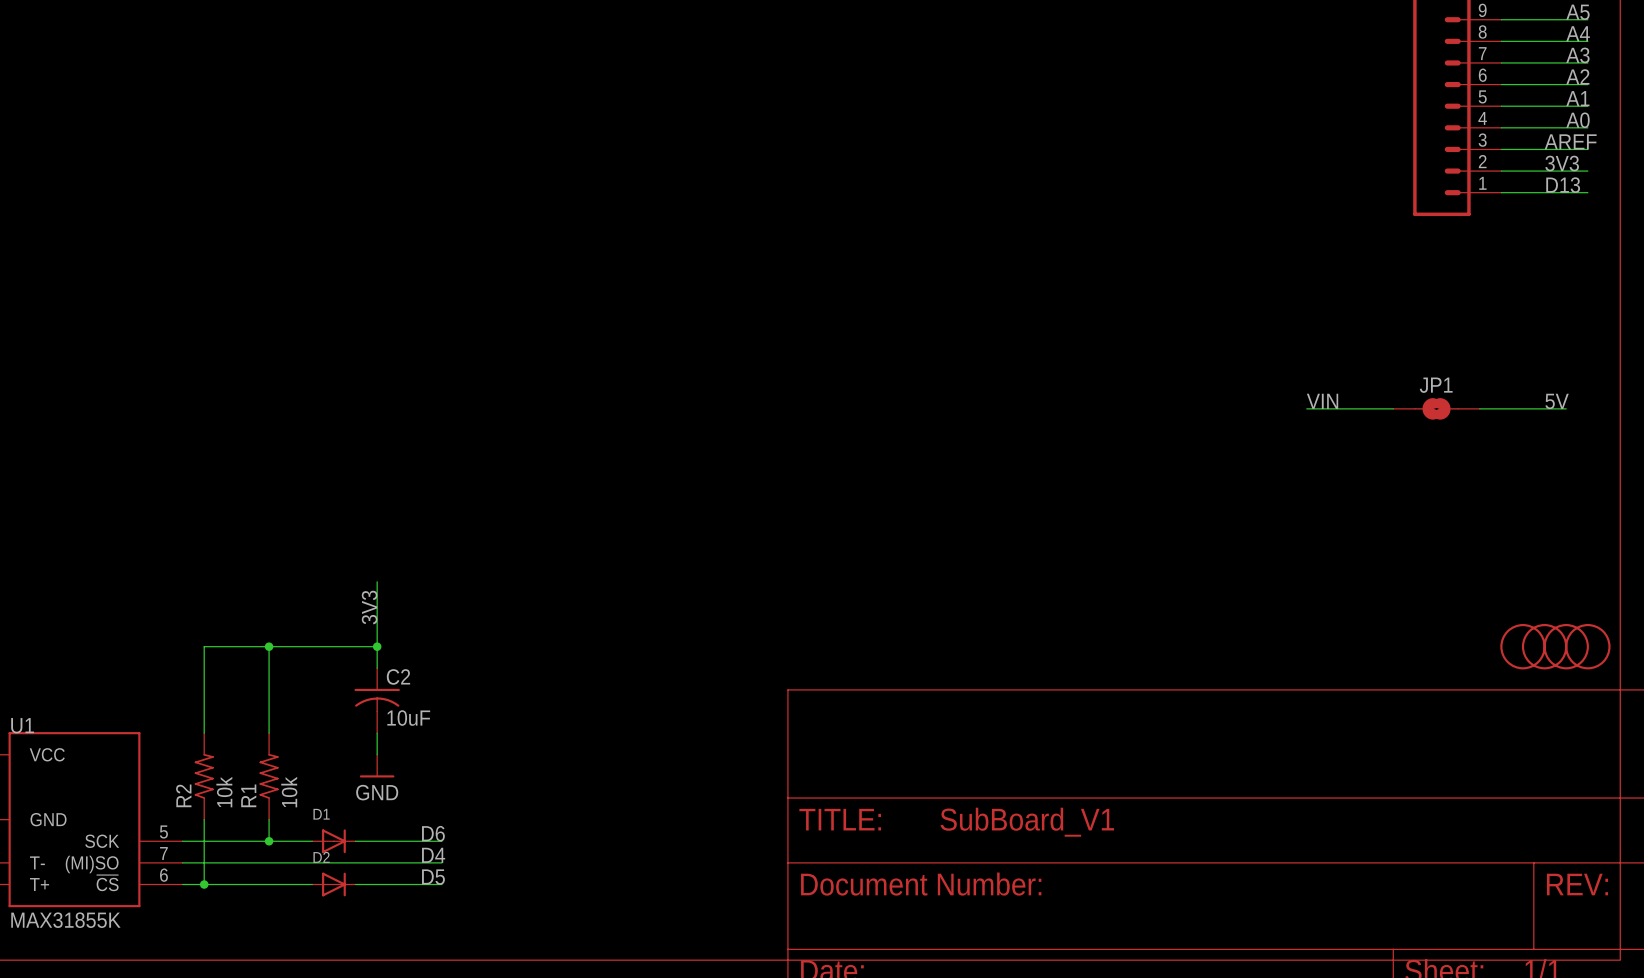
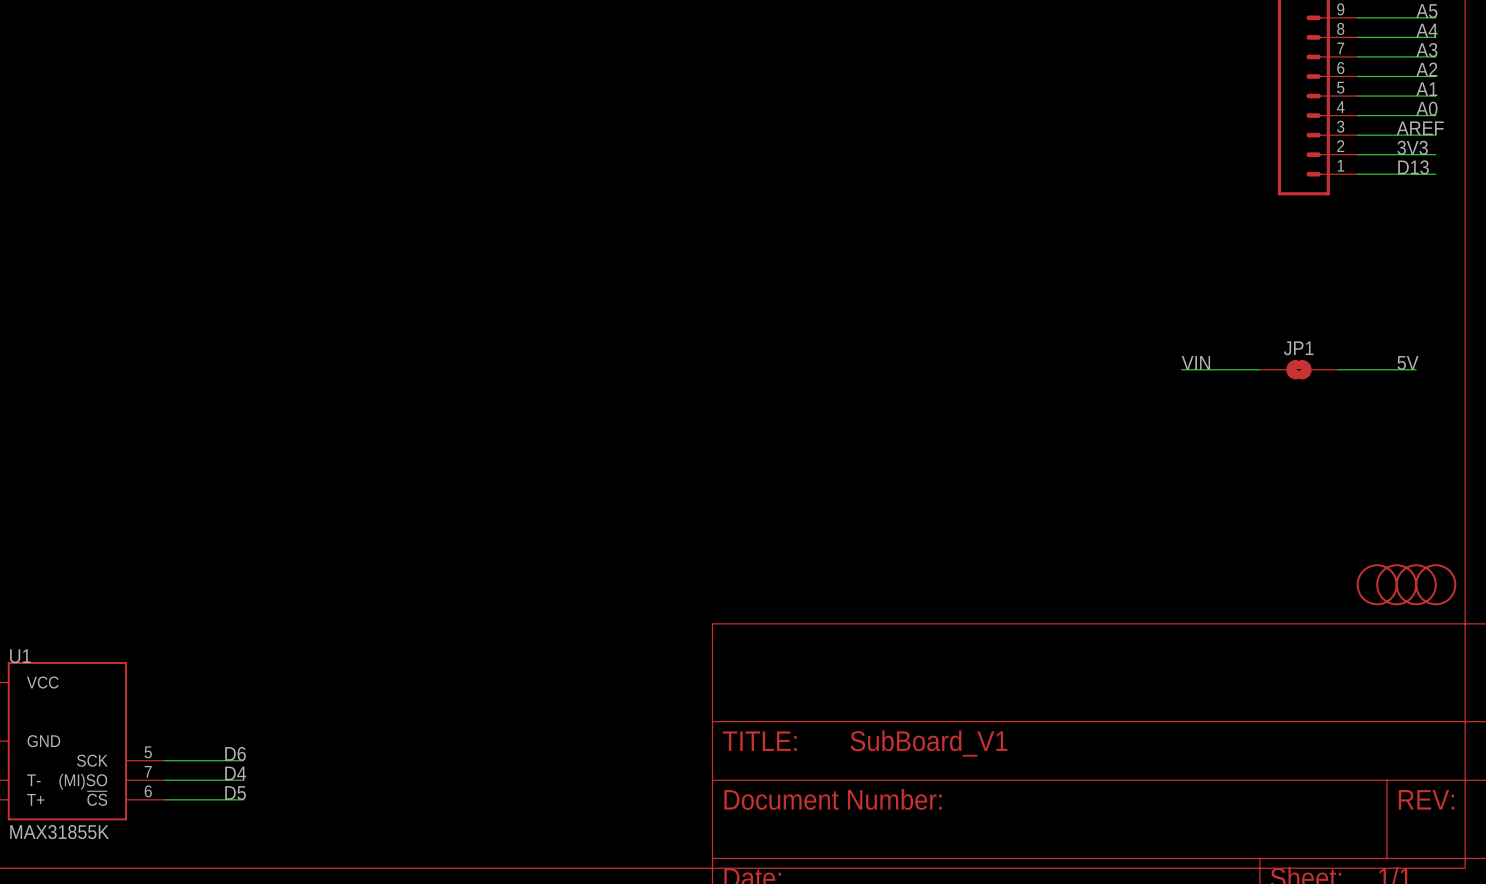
wire: (377, 581) (377, 668) -> none
label: 3V3 (369, 607) -> none
wire: (269, 646) (269, 733) -> none
junction: (269, 646) -> none
wire: (377, 646) (204, 646) (204, 733) -> none
junction: (377, 646) -> none
C2: 10uF (377, 700) -> none
wire: (377, 733) (377, 754) -> none
power symbol: GND (377, 766) -> none
R2: 10k (204, 776) -> none
R1: 10k (269, 776) -> none
wire: (204, 819) (204, 884) -> none
wire: (269, 819) (269, 841) (312, 841) -> none
label position: D6 (433, 833) -> D6 (235, 753)
junction: (269, 841) -> none
D1: (333, 841) -> none
wire: (355, 841) (442, 841) -> none
label position: D4 (433, 855) -> D4 (235, 773)
wire: (269, 862) (442, 862) -> none
label position: D5 (433, 877) -> D5 (235, 793)
junction: (204, 884) -> none
wire: (269, 884) (312, 884) -> none
D2: (333, 884) -> none
wire: (355, 884) (442, 884) -> none

